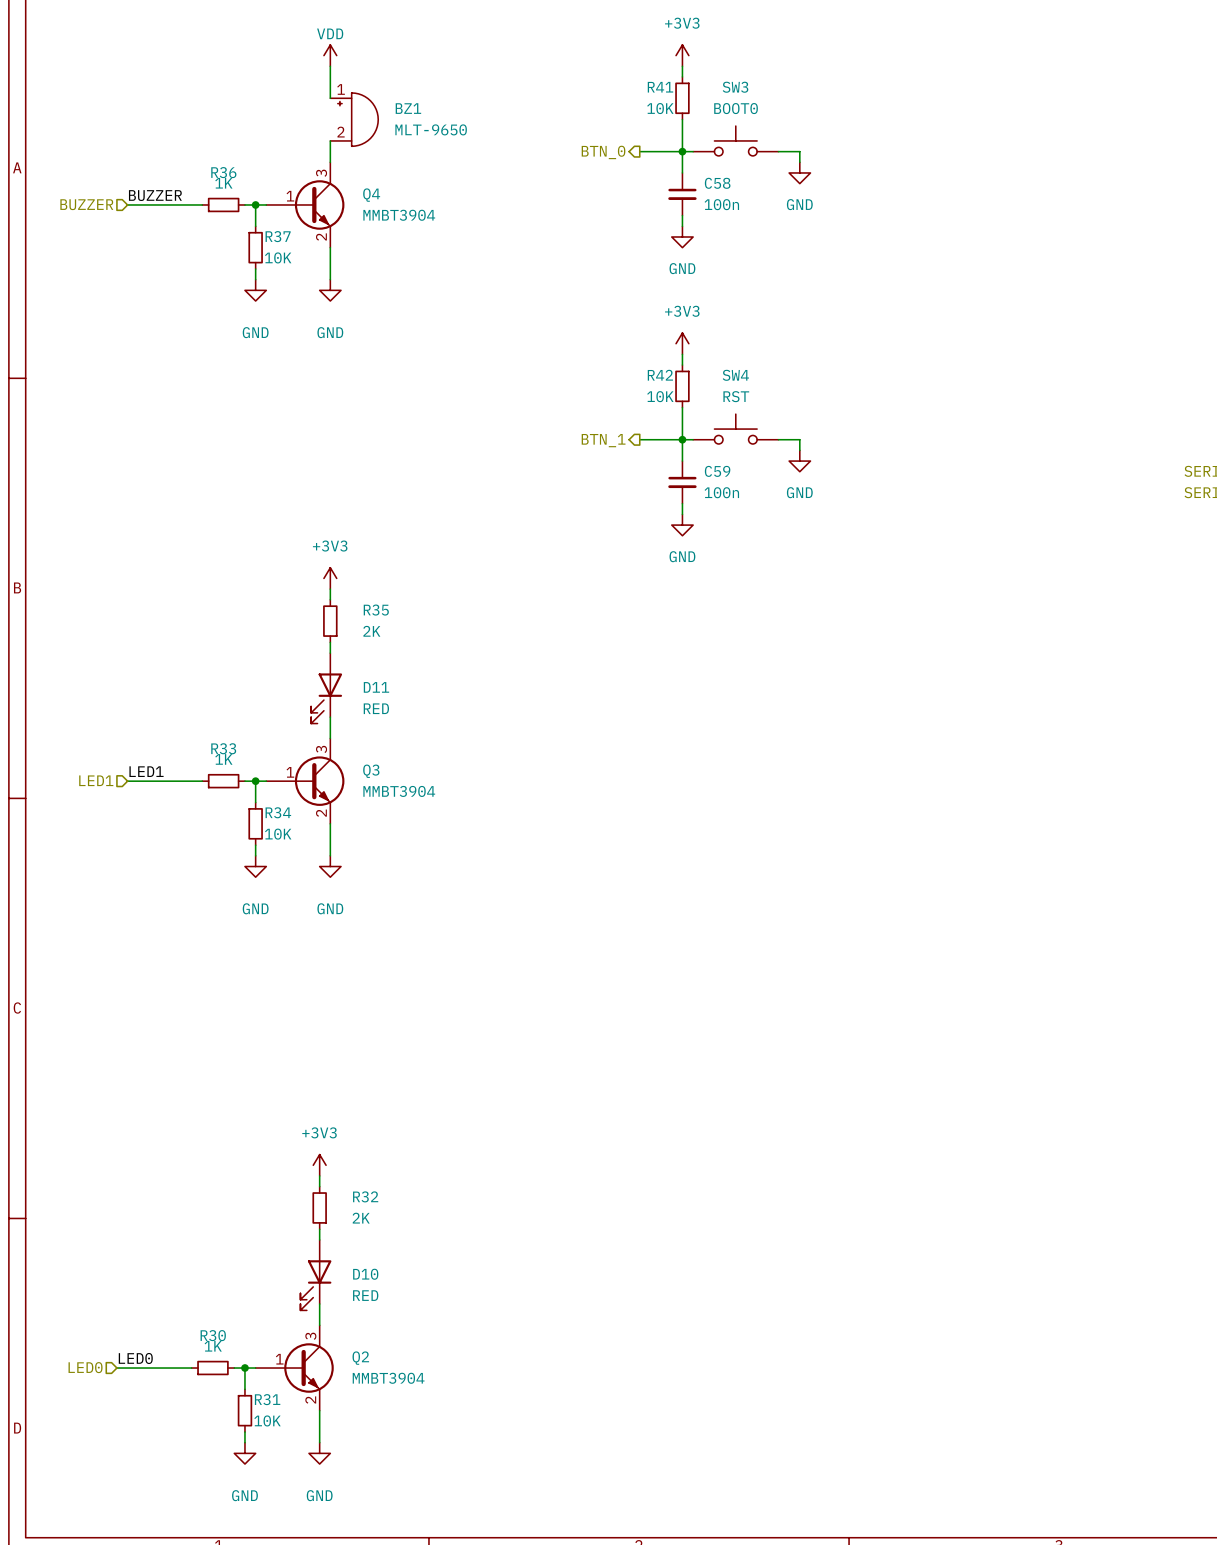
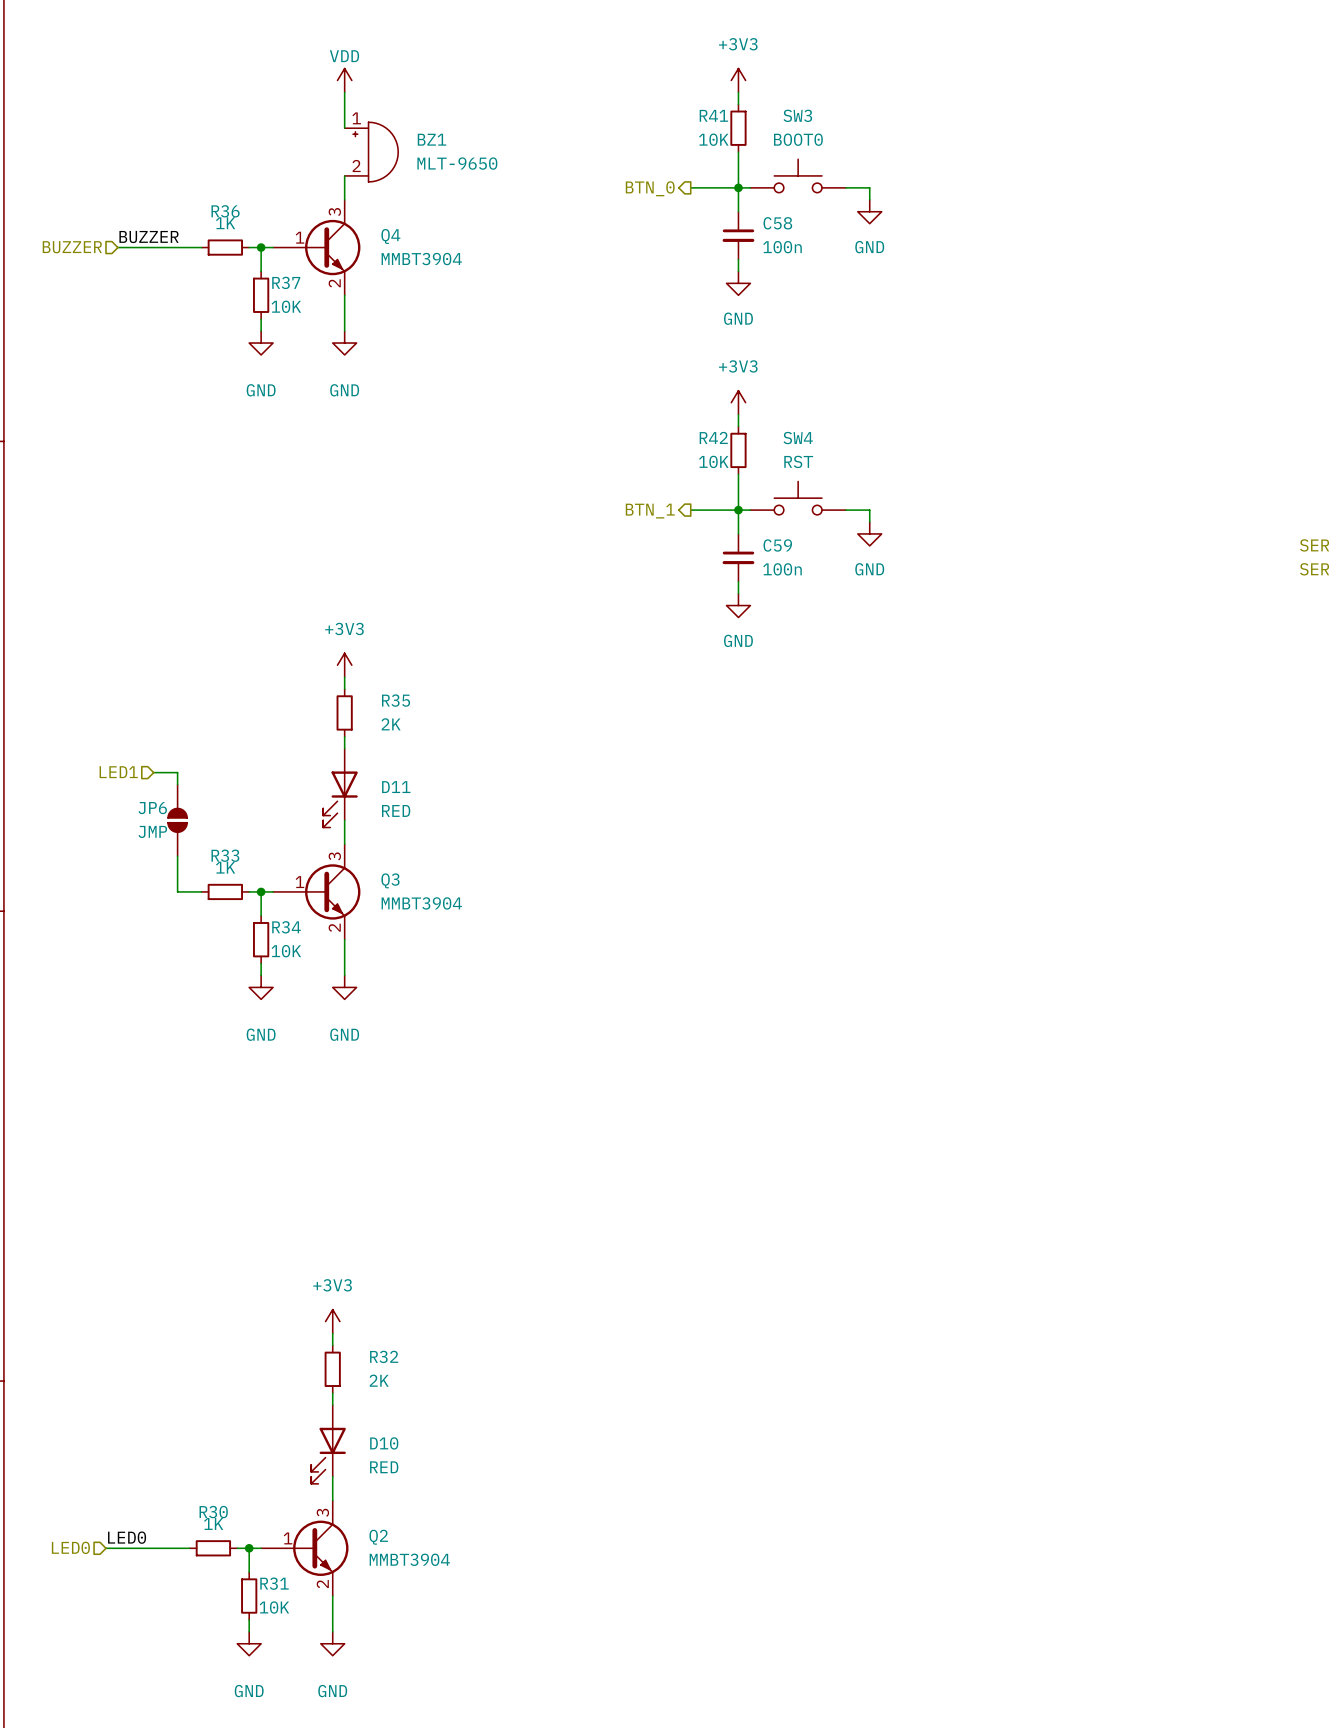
wire: none -> (153, 772) (177, 772) (177, 784)
JP6: none -> JMP (177, 820)
label: LED1 (146, 771) -> none
hierarchical label position: LED1 (96, 780) -> LED1 (118, 772)
wire: (127, 781) (180, 781) -> (177, 856) (177, 891)

